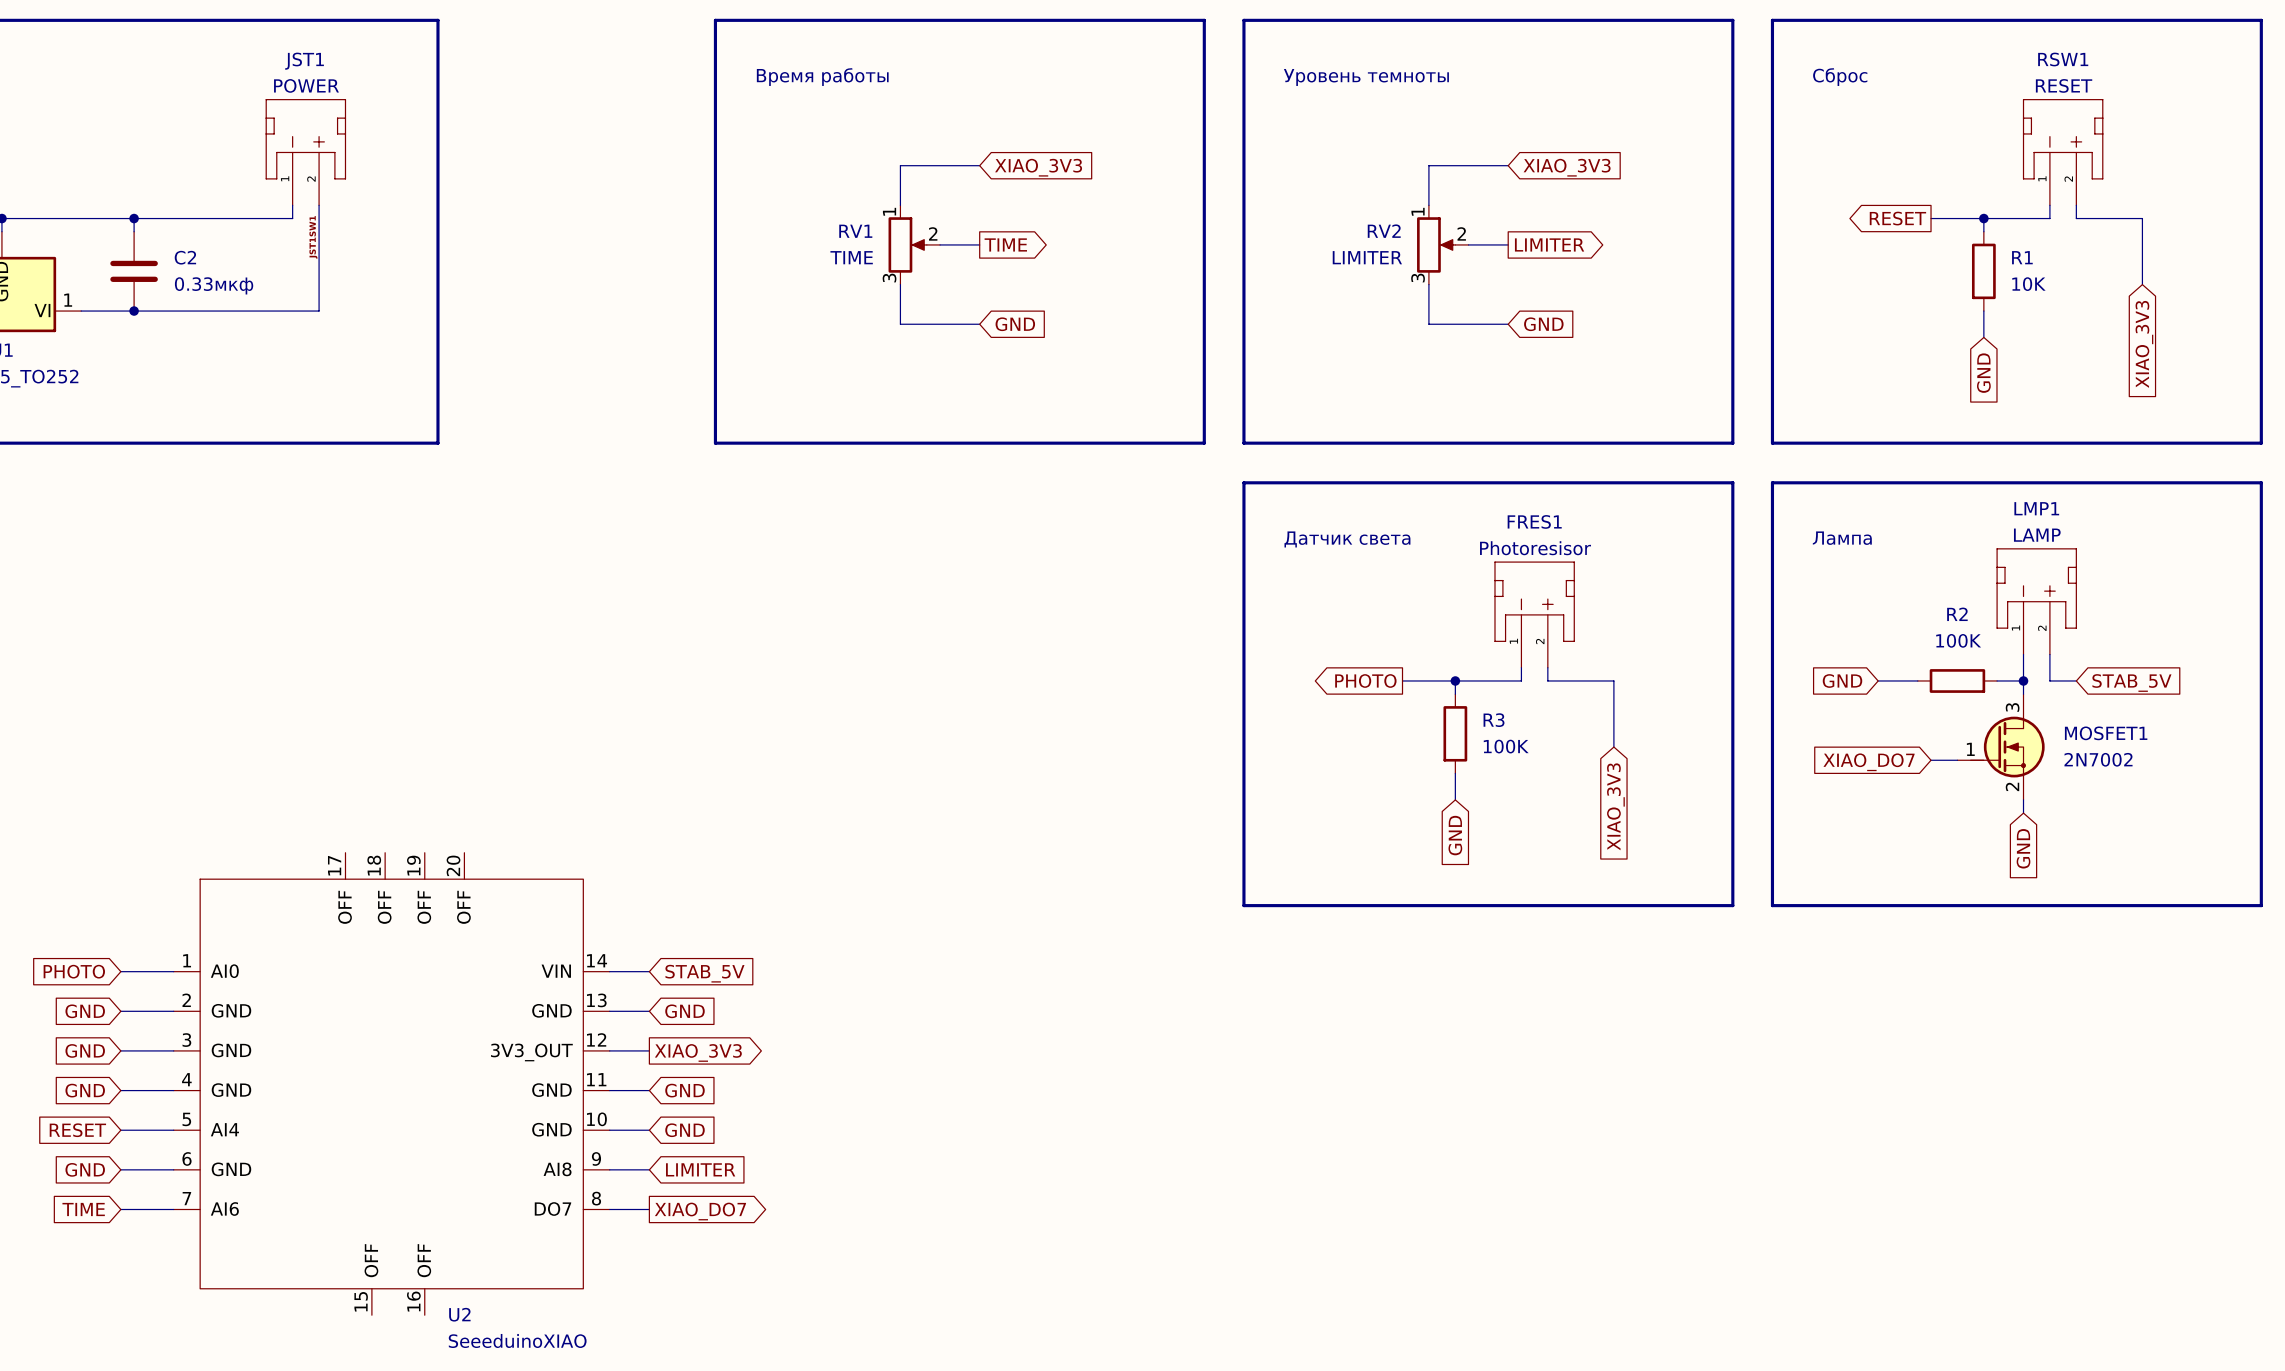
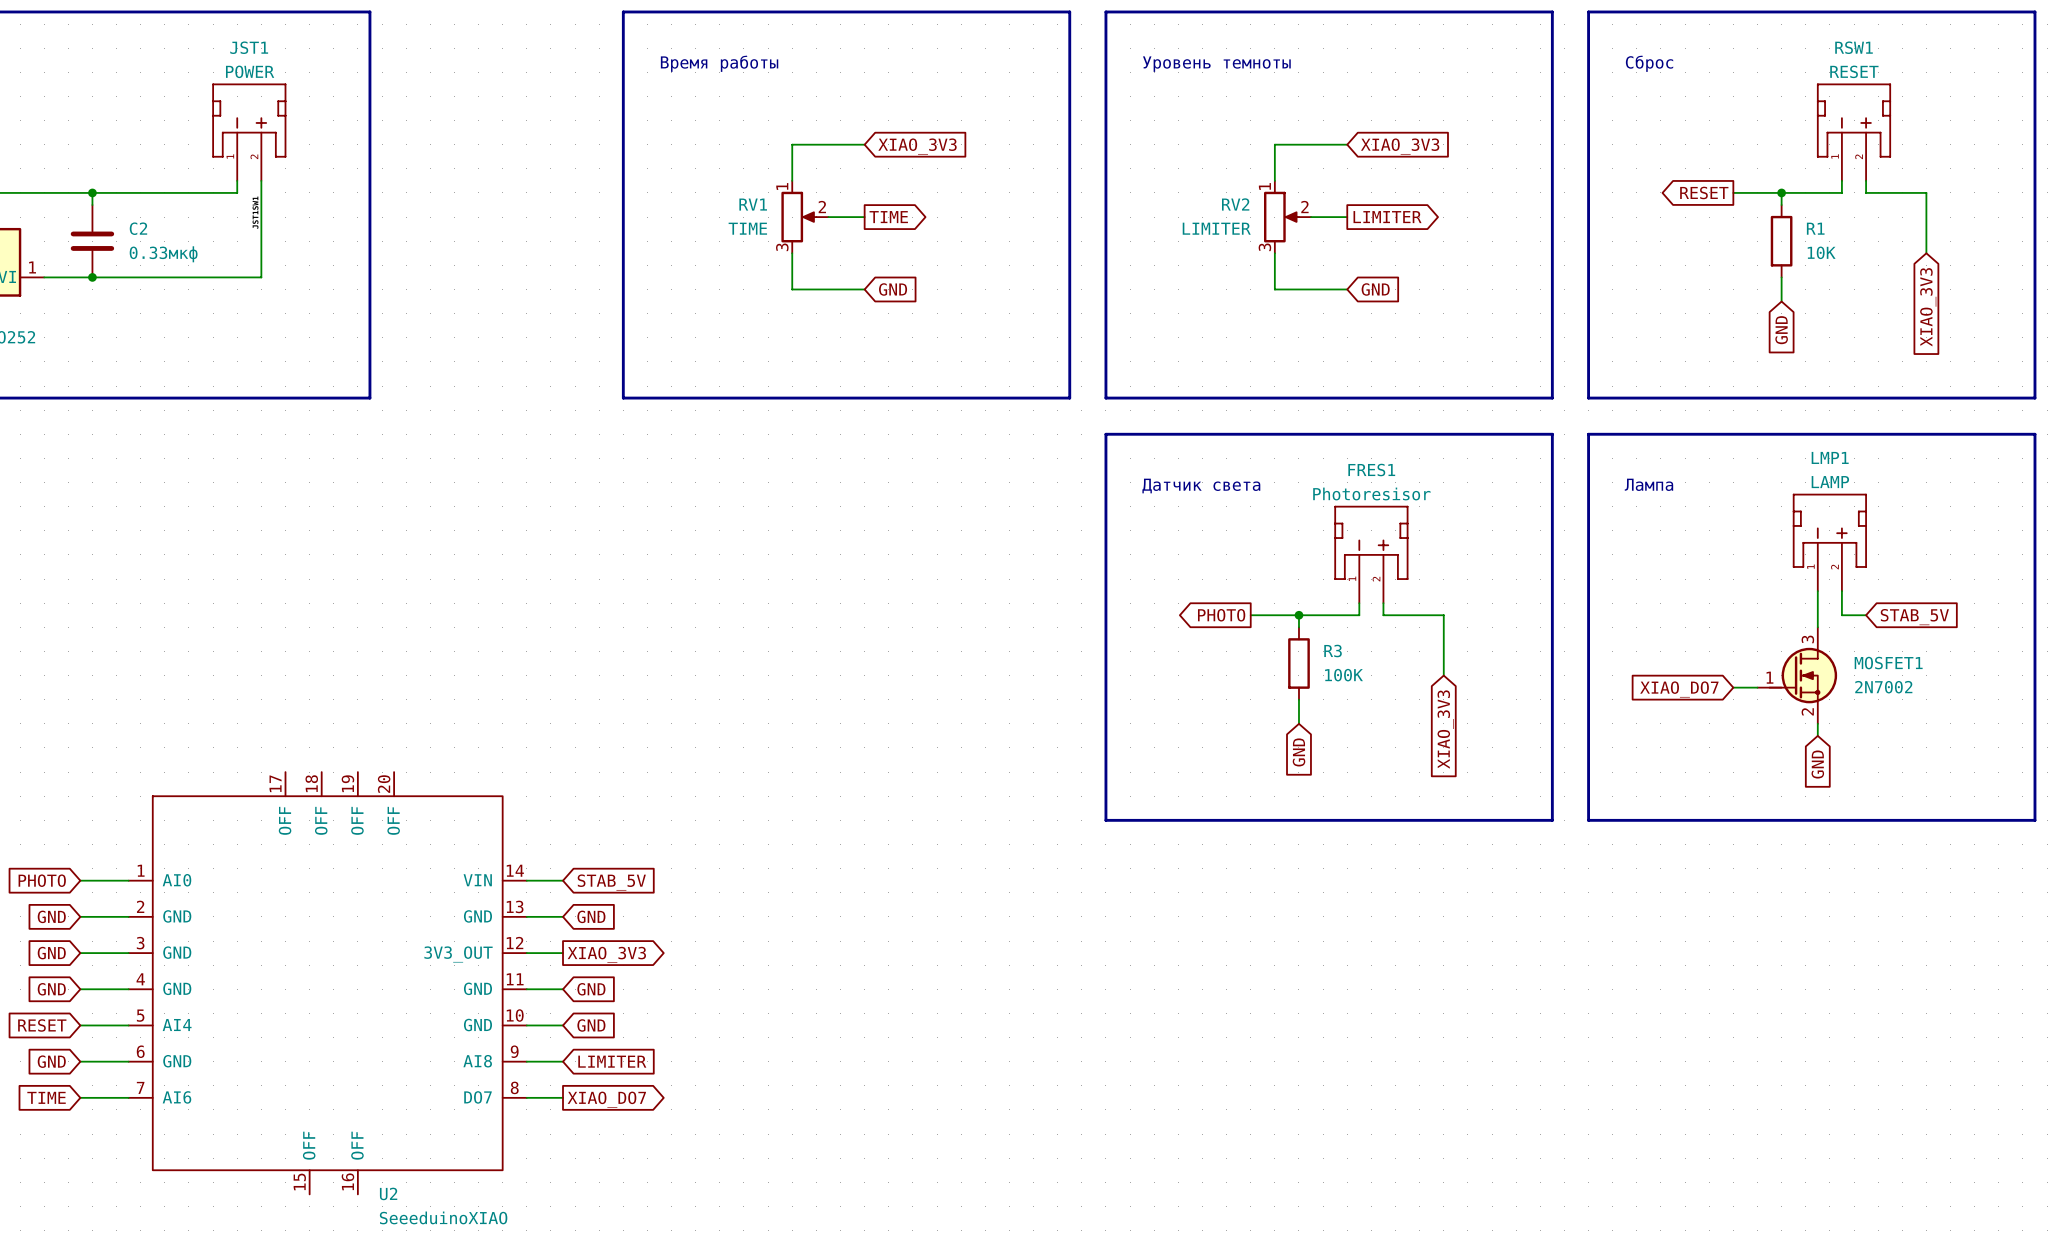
global label: GND (1842, 680) -> none
wire: (1878, 680) (1917, 680) -> none
R2: 100K (1957, 680) -> none
wire: (1997, 680) (2023, 680) -> none
junction: (2023, 680) -> none

